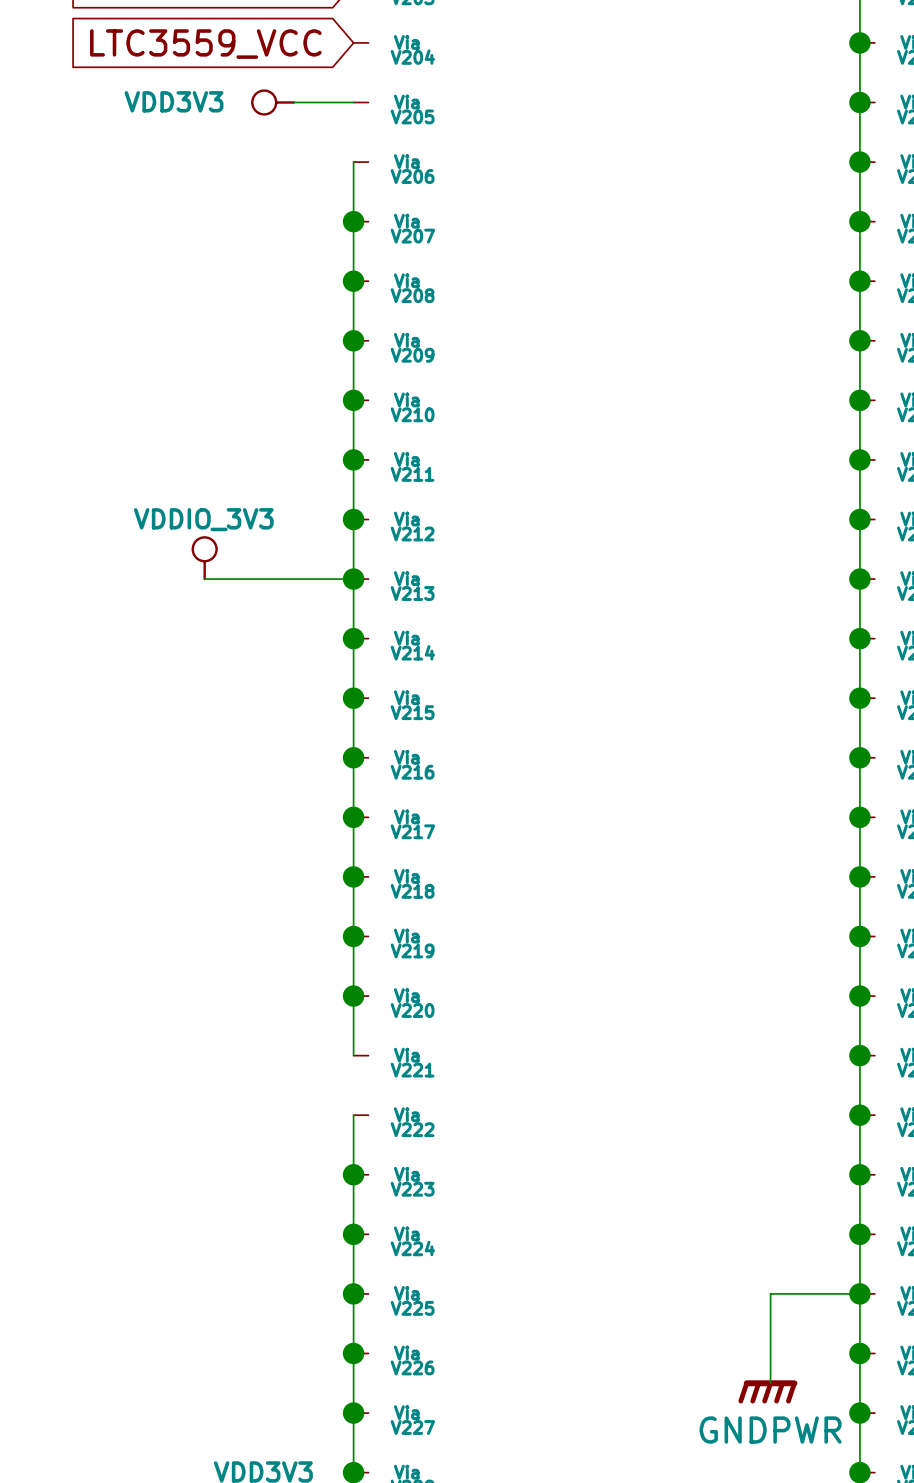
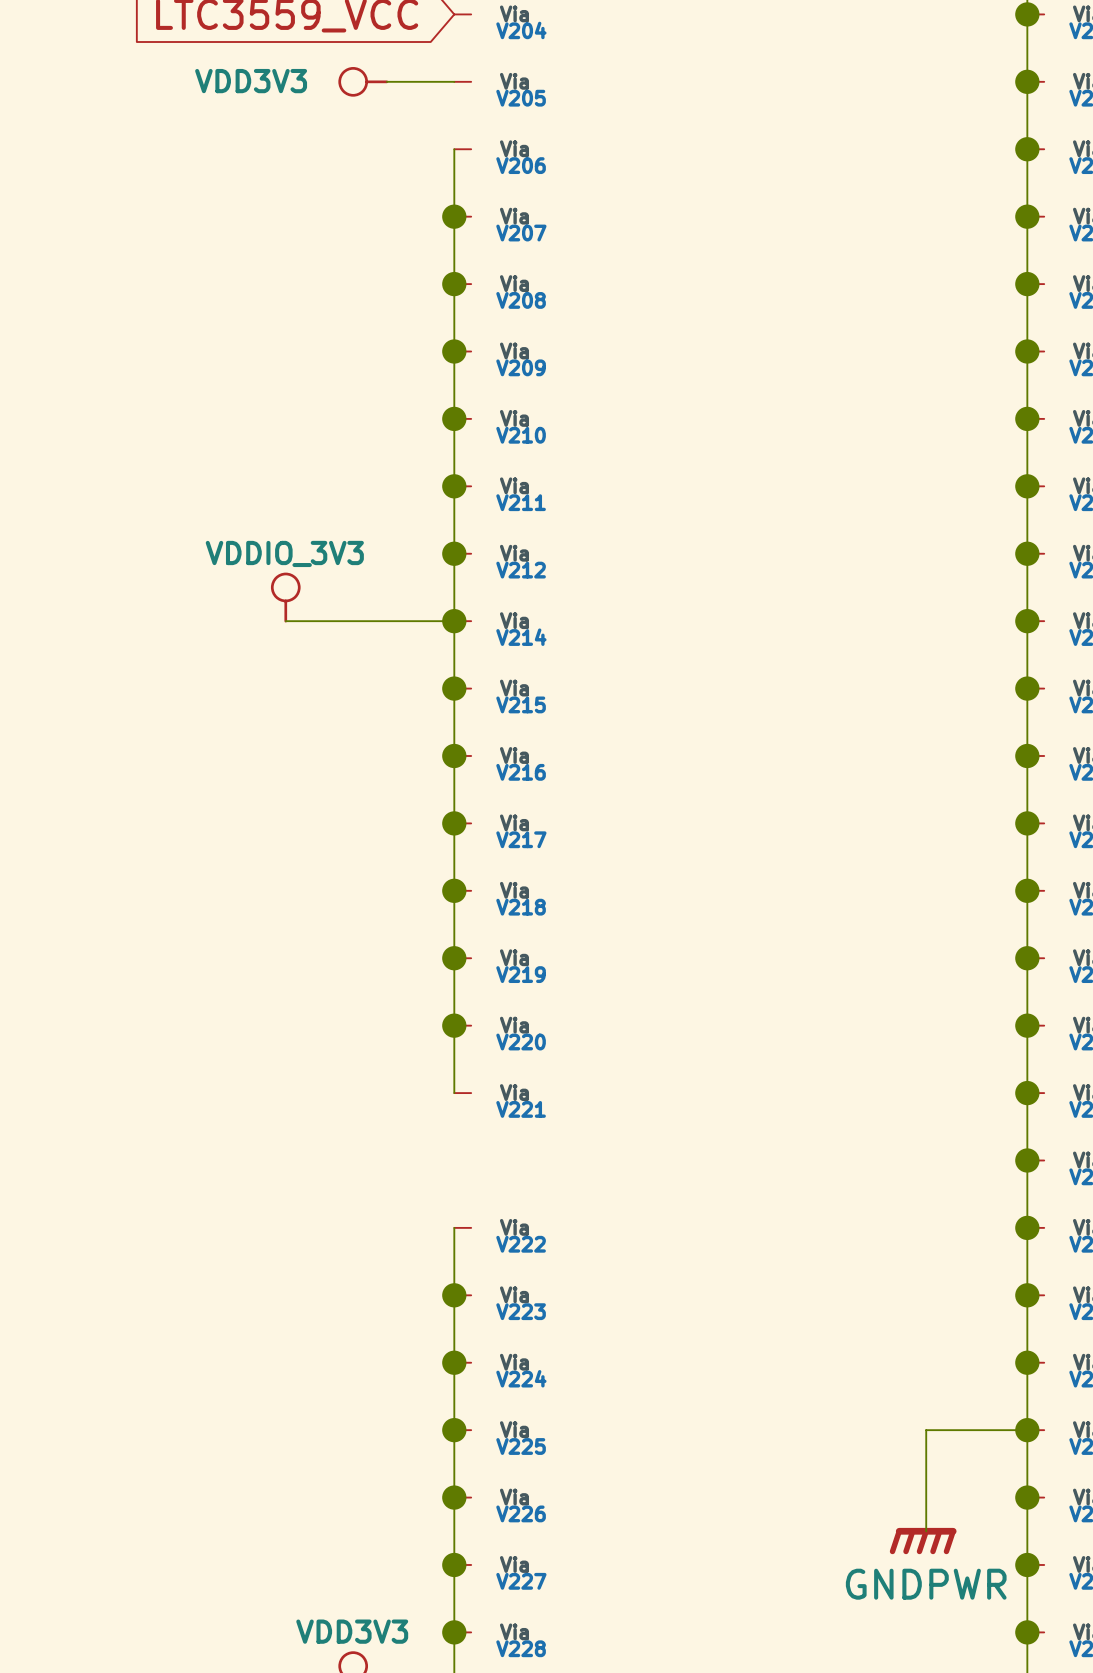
V213 name: V213 (412, 593) -> V214 (521, 637)
V214 name: V214 (412, 652) -> V215 (521, 704)
V215 name: V215 (412, 712) -> V216 (521, 772)
V216 name: V216 (412, 772) -> V217 (521, 839)
V217 name: V217 (412, 831) -> V218 (521, 907)
V218 name: V218 (412, 891) -> V219 (521, 974)
V219 name: V219 (412, 950) -> V220 (521, 1042)
wire: (353, 996) (353, 1055) -> none
junction: (353, 996) -> none
V220 name: V220 (412, 1010) -> V221 (521, 1109)
V221: (361, 1055) -> none

